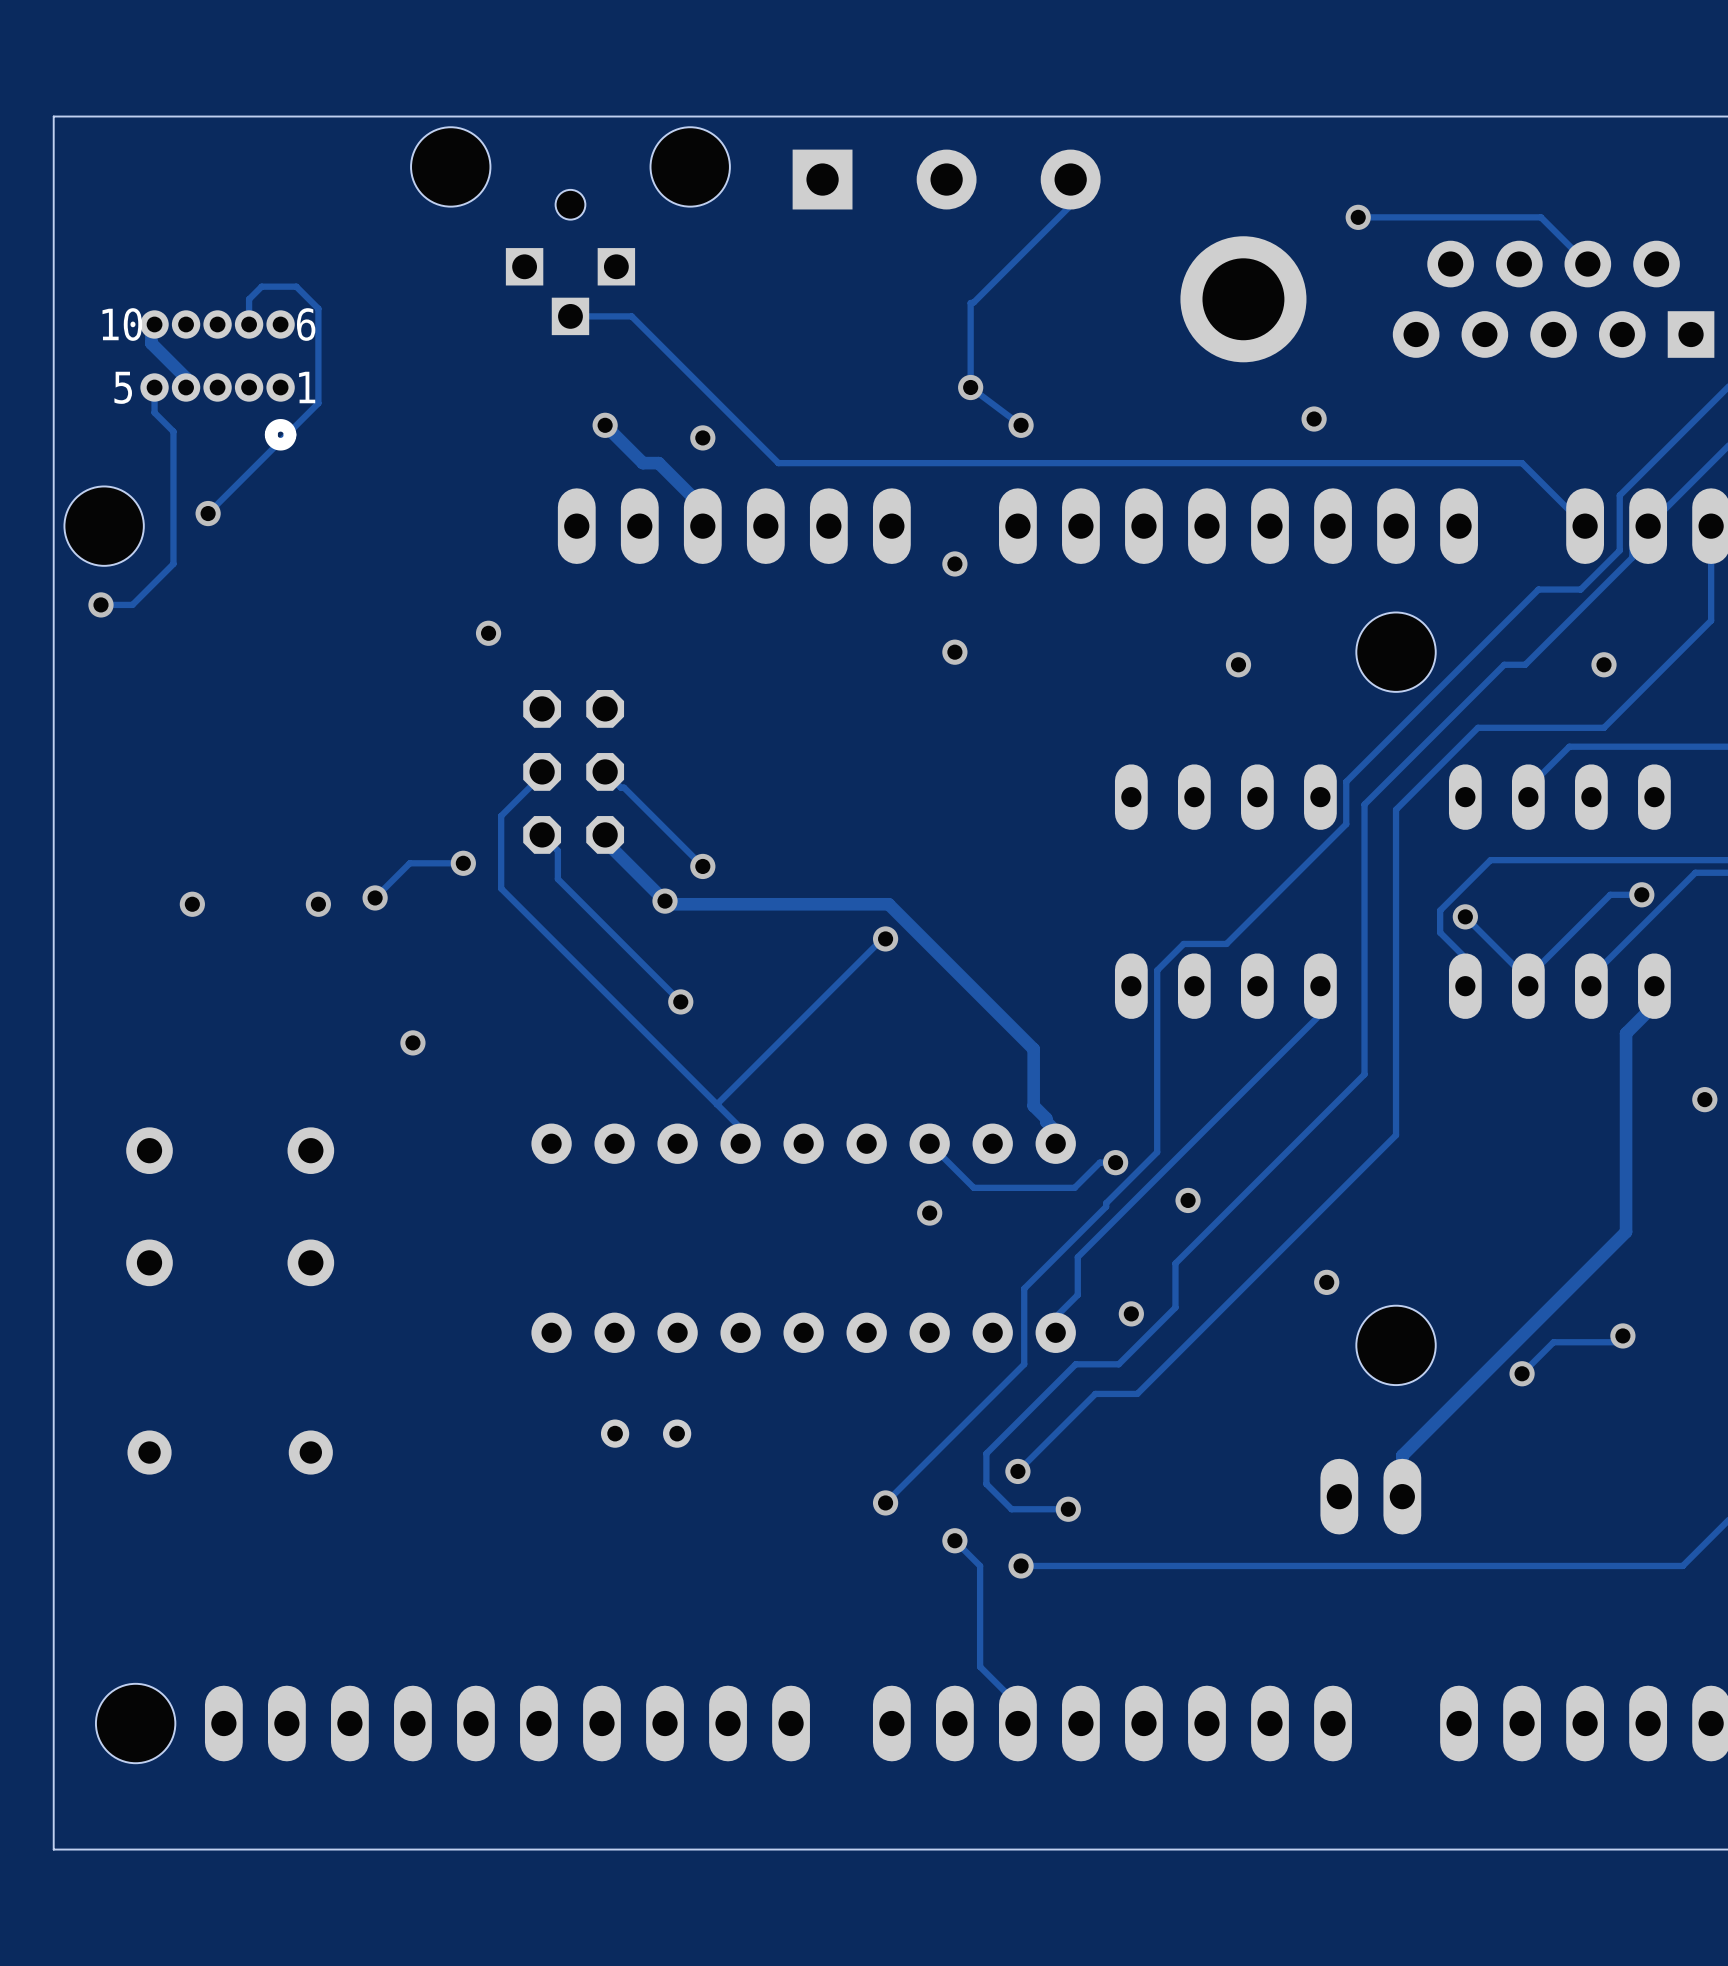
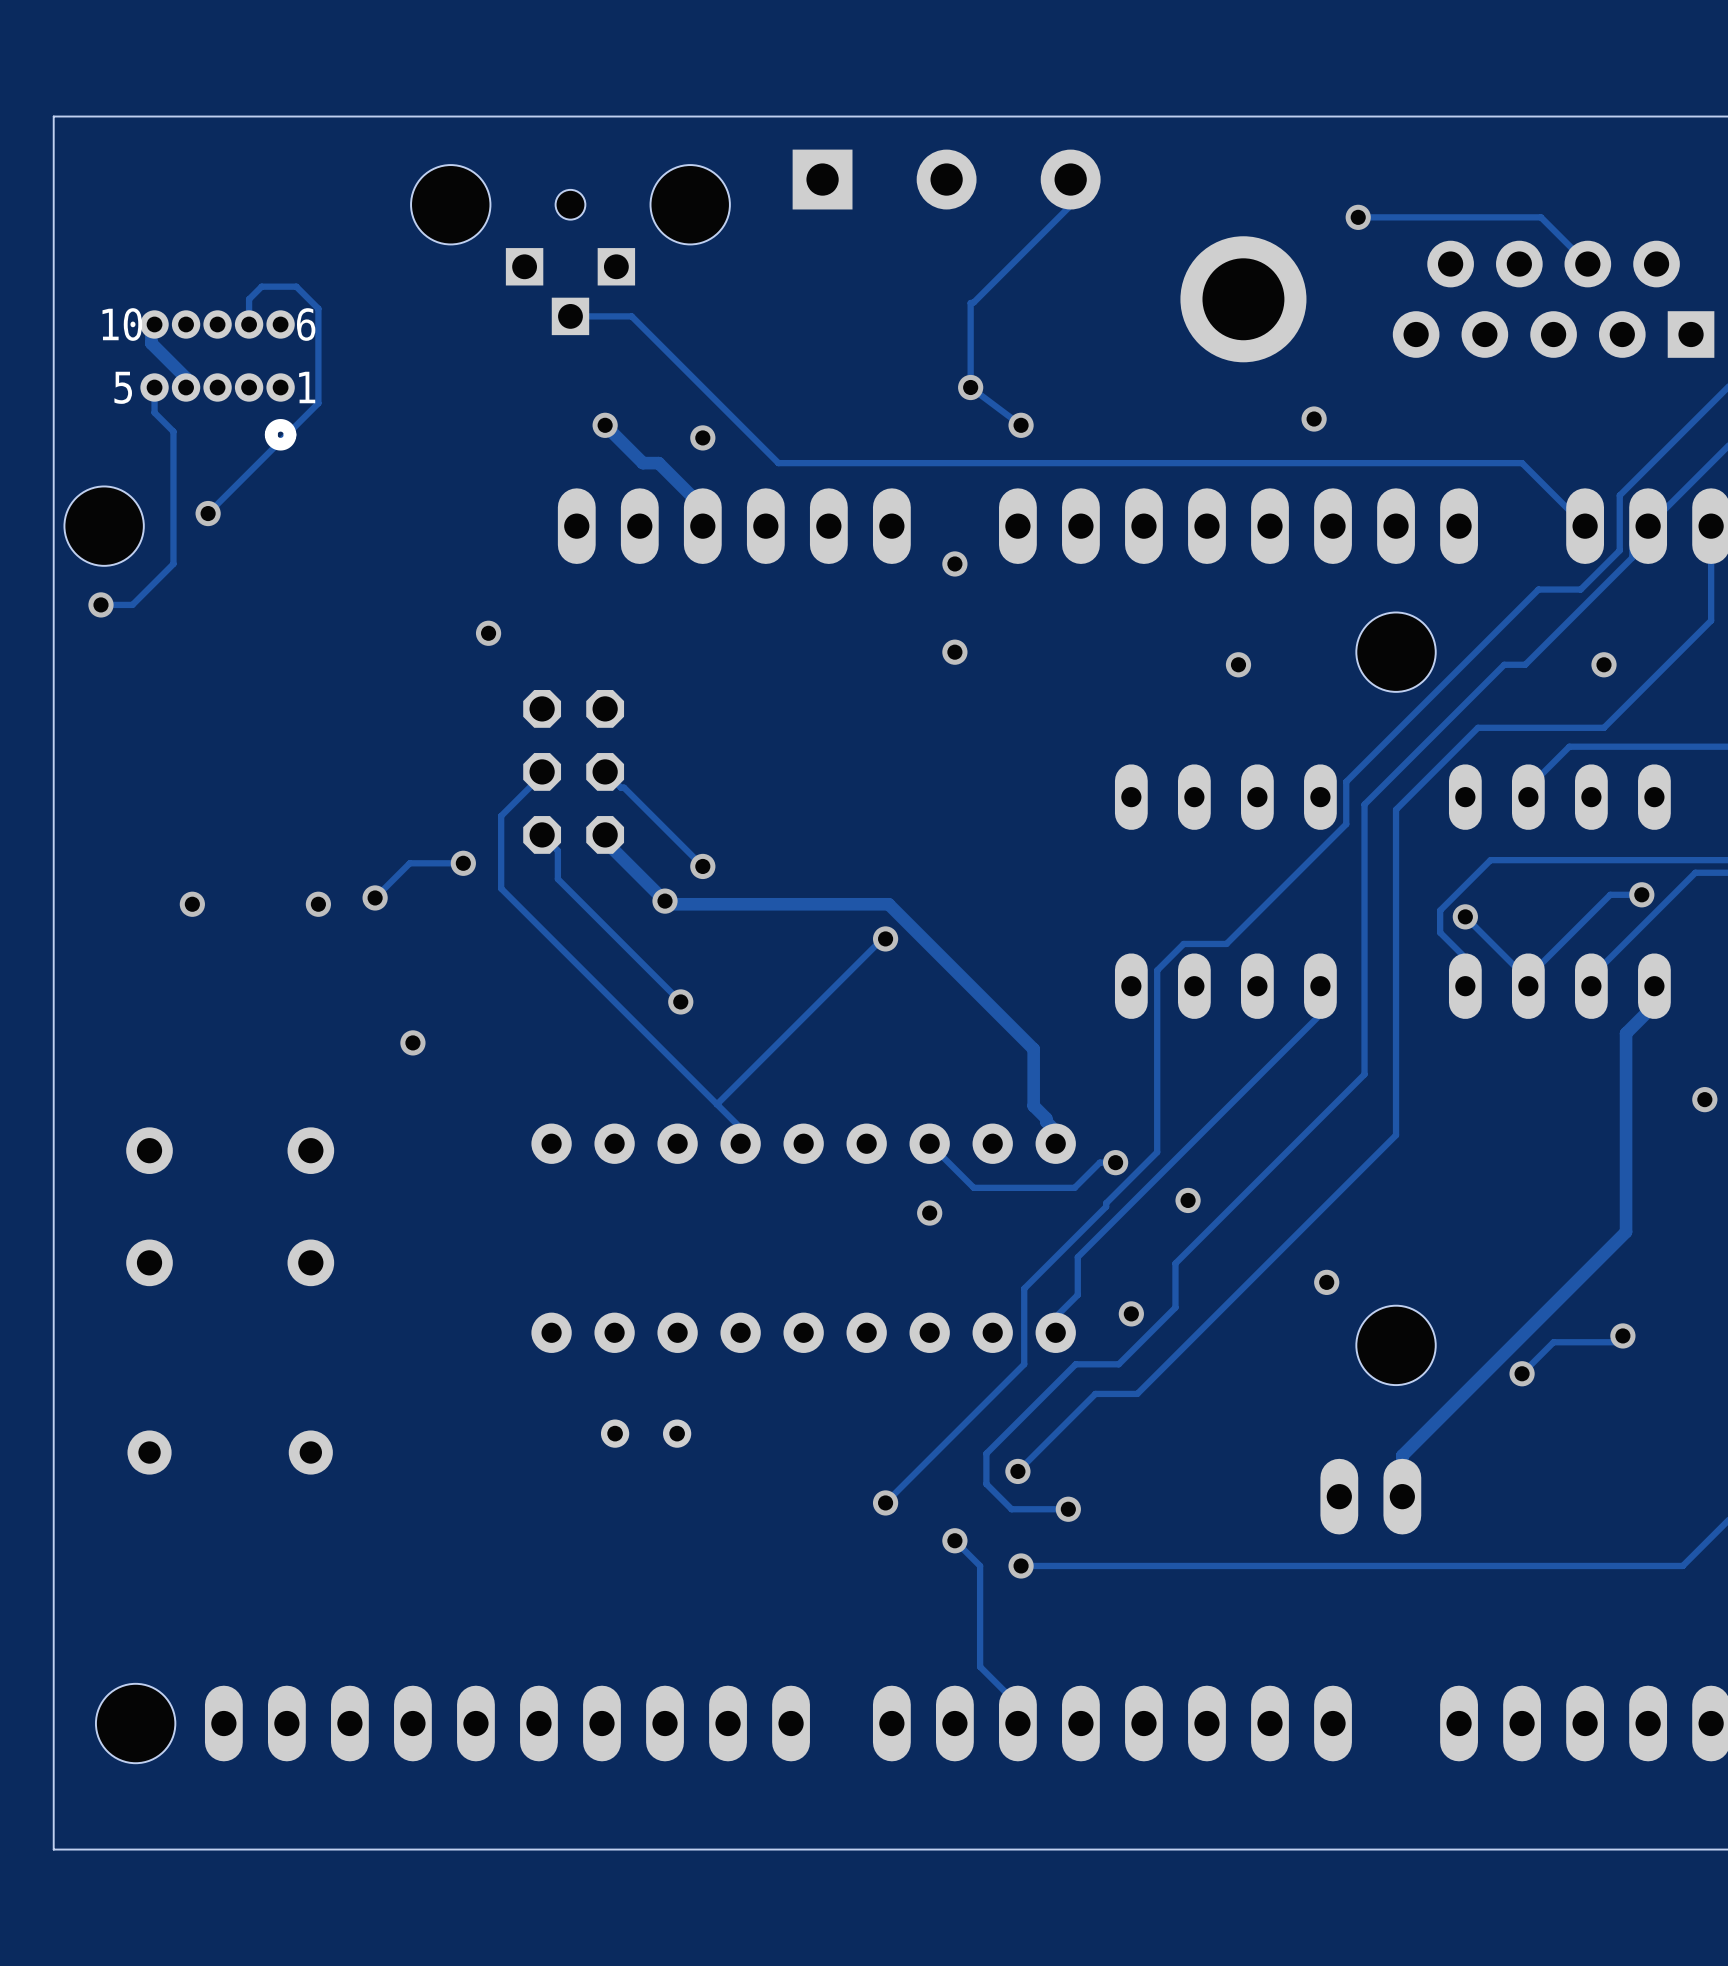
hole position: (450, 166) -> (450, 204)
hole position: (690, 166) -> (690, 204)

